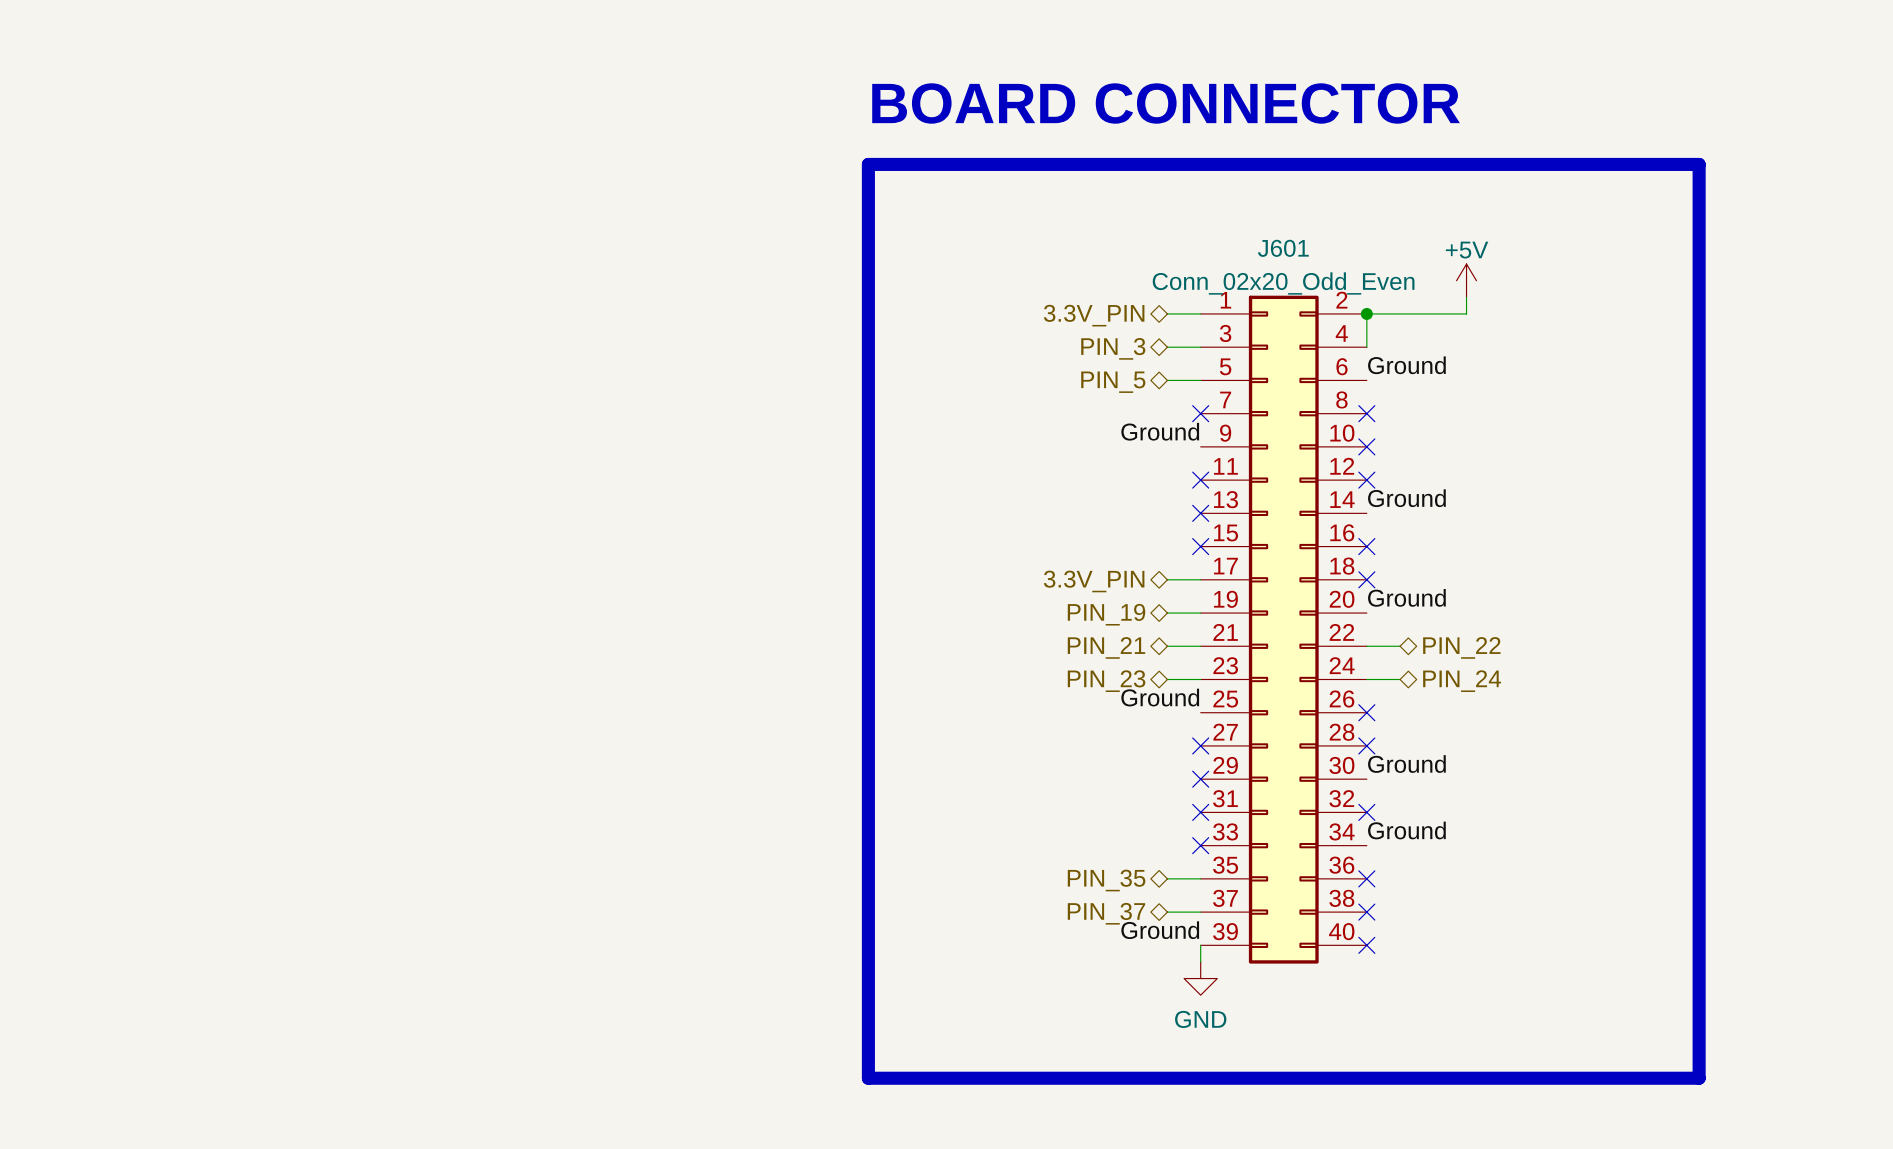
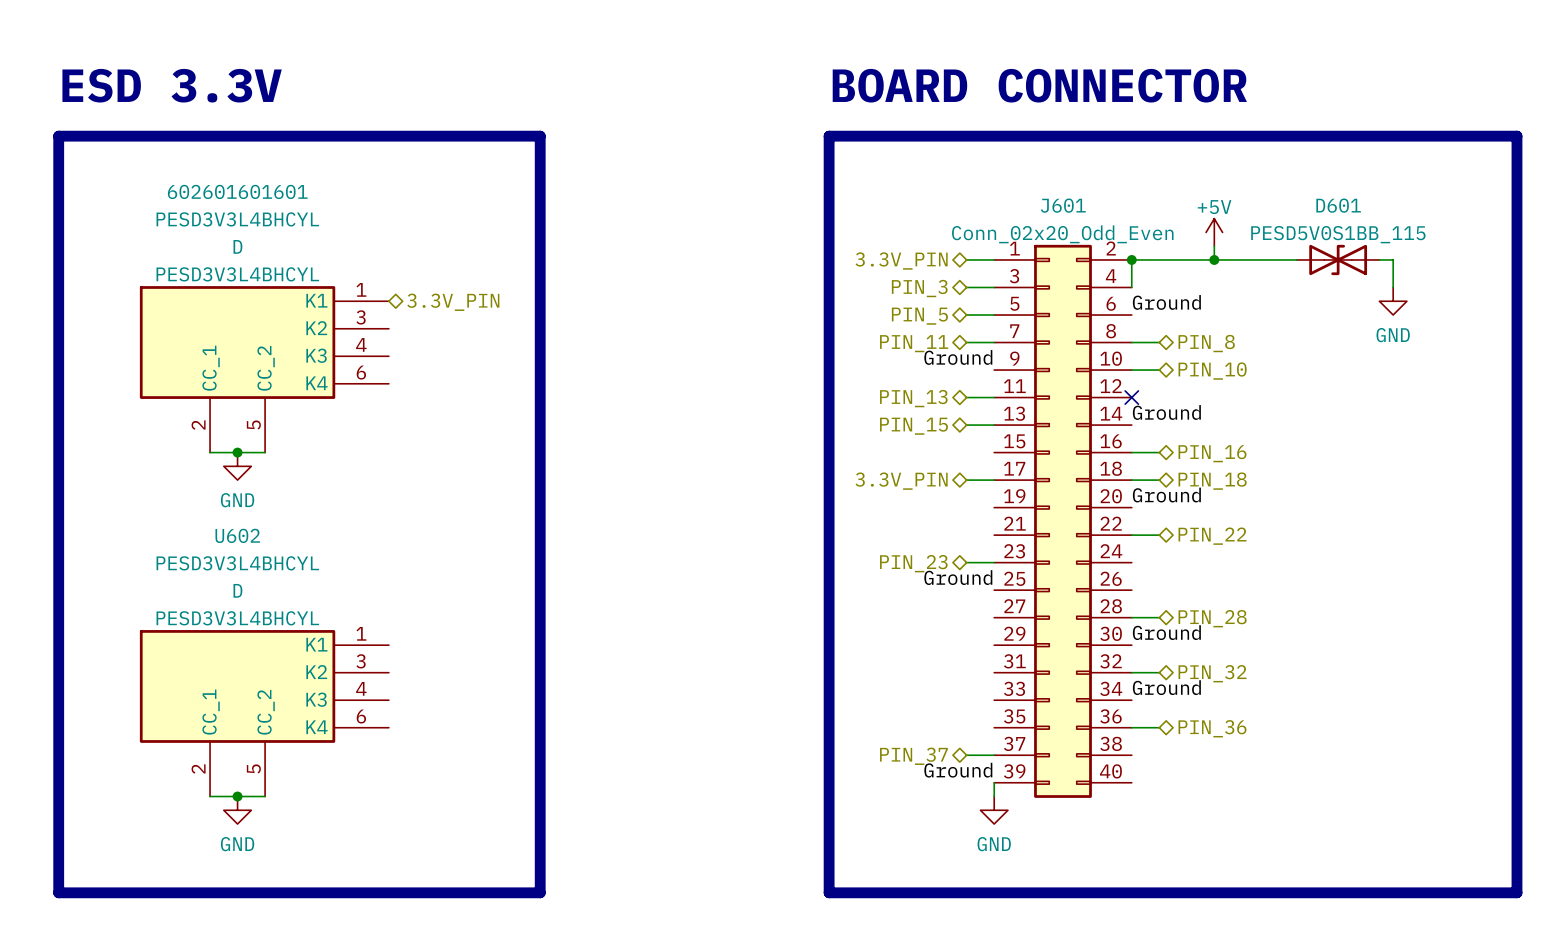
text: none -> ESD 3.3V (172, 85)
text position: BOARD CONNECTOR (1166, 103) -> BOARD CONNECTOR (1039, 85)
line: none -> (58, 136) (540, 136) (540, 892) (58, 892) (58, 136)
line: (1001, 164) (868, 164) (868, 1078) (1001, 1078) -> (829, 136) (829, 892)
line: (1699, 164) (1699, 1078) -> (1406, 136) (1516, 136) (1516, 892) (1406, 892)
wire: none -> (1214, 259) (1296, 259)
junction: none -> (1214, 259)
D601: none -> PESD5V0S1BB_115 (1338, 259)
wire: none -> (1379, 259) (1393, 259) (1393, 287)
power symbol: none -> GND (1393, 301)
hierarchical label: none -> 3.3V_PIN (453, 302)
wire: none -> (966, 342) (994, 342)
no-connect mark: (1200, 413) -> none
wire: none -> (1131, 342) (1159, 342)
no-connect mark: (1366, 413) -> none
hierarchical label: none -> PIN_11 (914, 343)
hierarchical label: none -> PIN_8 (1206, 343)
602601601601: none -> PESD3V3L4BHCYL (264, 369)
wire: none -> (1131, 370) (1159, 370)
no-connect mark: (1366, 446) -> none
hierarchical label: none -> PIN_10 (1212, 371)
no-connect mark: (1200, 480) -> none
hierarchical label: none -> PIN_13 (913, 398)
no-connect mark: (1200, 513) -> none
hierarchical label: none -> PIN_15 (913, 426)
wire: none -> (210, 452) (265, 452)
junction: none -> (237, 452)
no-connect mark: (1200, 546) -> none
no-connect mark: (1366, 546) -> none
hierarchical label: none -> PIN_16 (1212, 453)
power symbol: none -> GND (237, 466)
wire: none -> (1131, 480) (1159, 480)
no-connect mark: (1366, 579) -> none
hierarchical label: none -> PIN_18 (1212, 481)
wire: (1167, 613) (1200, 613) -> (966, 397) (994, 397)
hierarchical label: PIN_19 (1106, 614) -> none
wire: (1167, 646) (1200, 646) -> (966, 425) (994, 425)
hierarchical label: PIN_21 (1106, 647) -> none
wire: (1366, 679) (1400, 679) -> (1131, 452) (1159, 452)
hierarchical label: PIN_24 (1462, 681) -> none
no-connect mark: (1366, 712) -> none
no-connect mark: (1200, 745) -> none
wire: none -> (1131, 617) (1159, 617)
no-connect mark: (1366, 745) -> none
hierarchical label: none -> PIN_28 (1212, 618)
no-connect mark: (1200, 779) -> none
no-connect mark: (1200, 812) -> none
no-connect mark: (1366, 812) -> none
hierarchical label: none -> PIN_32 (1212, 673)
no-connect mark: (1200, 845) -> none
U602: none -> PESD3V3L4BHCYL (264, 713)
wire: (1167, 878) (1200, 878) -> (1131, 672) (1159, 672)
wire: none -> (1131, 727) (1159, 727)
no-connect mark: (1366, 878) -> none
hierarchical label: PIN_35 (1106, 880) -> none
hierarchical label: none -> PIN_36 (1212, 728)
no-connect mark: (1366, 912) -> none
no-connect mark: (1366, 945) -> none
wire: none -> (210, 796) (265, 796)
junction: none -> (237, 796)
power symbol: none -> GND (237, 810)

